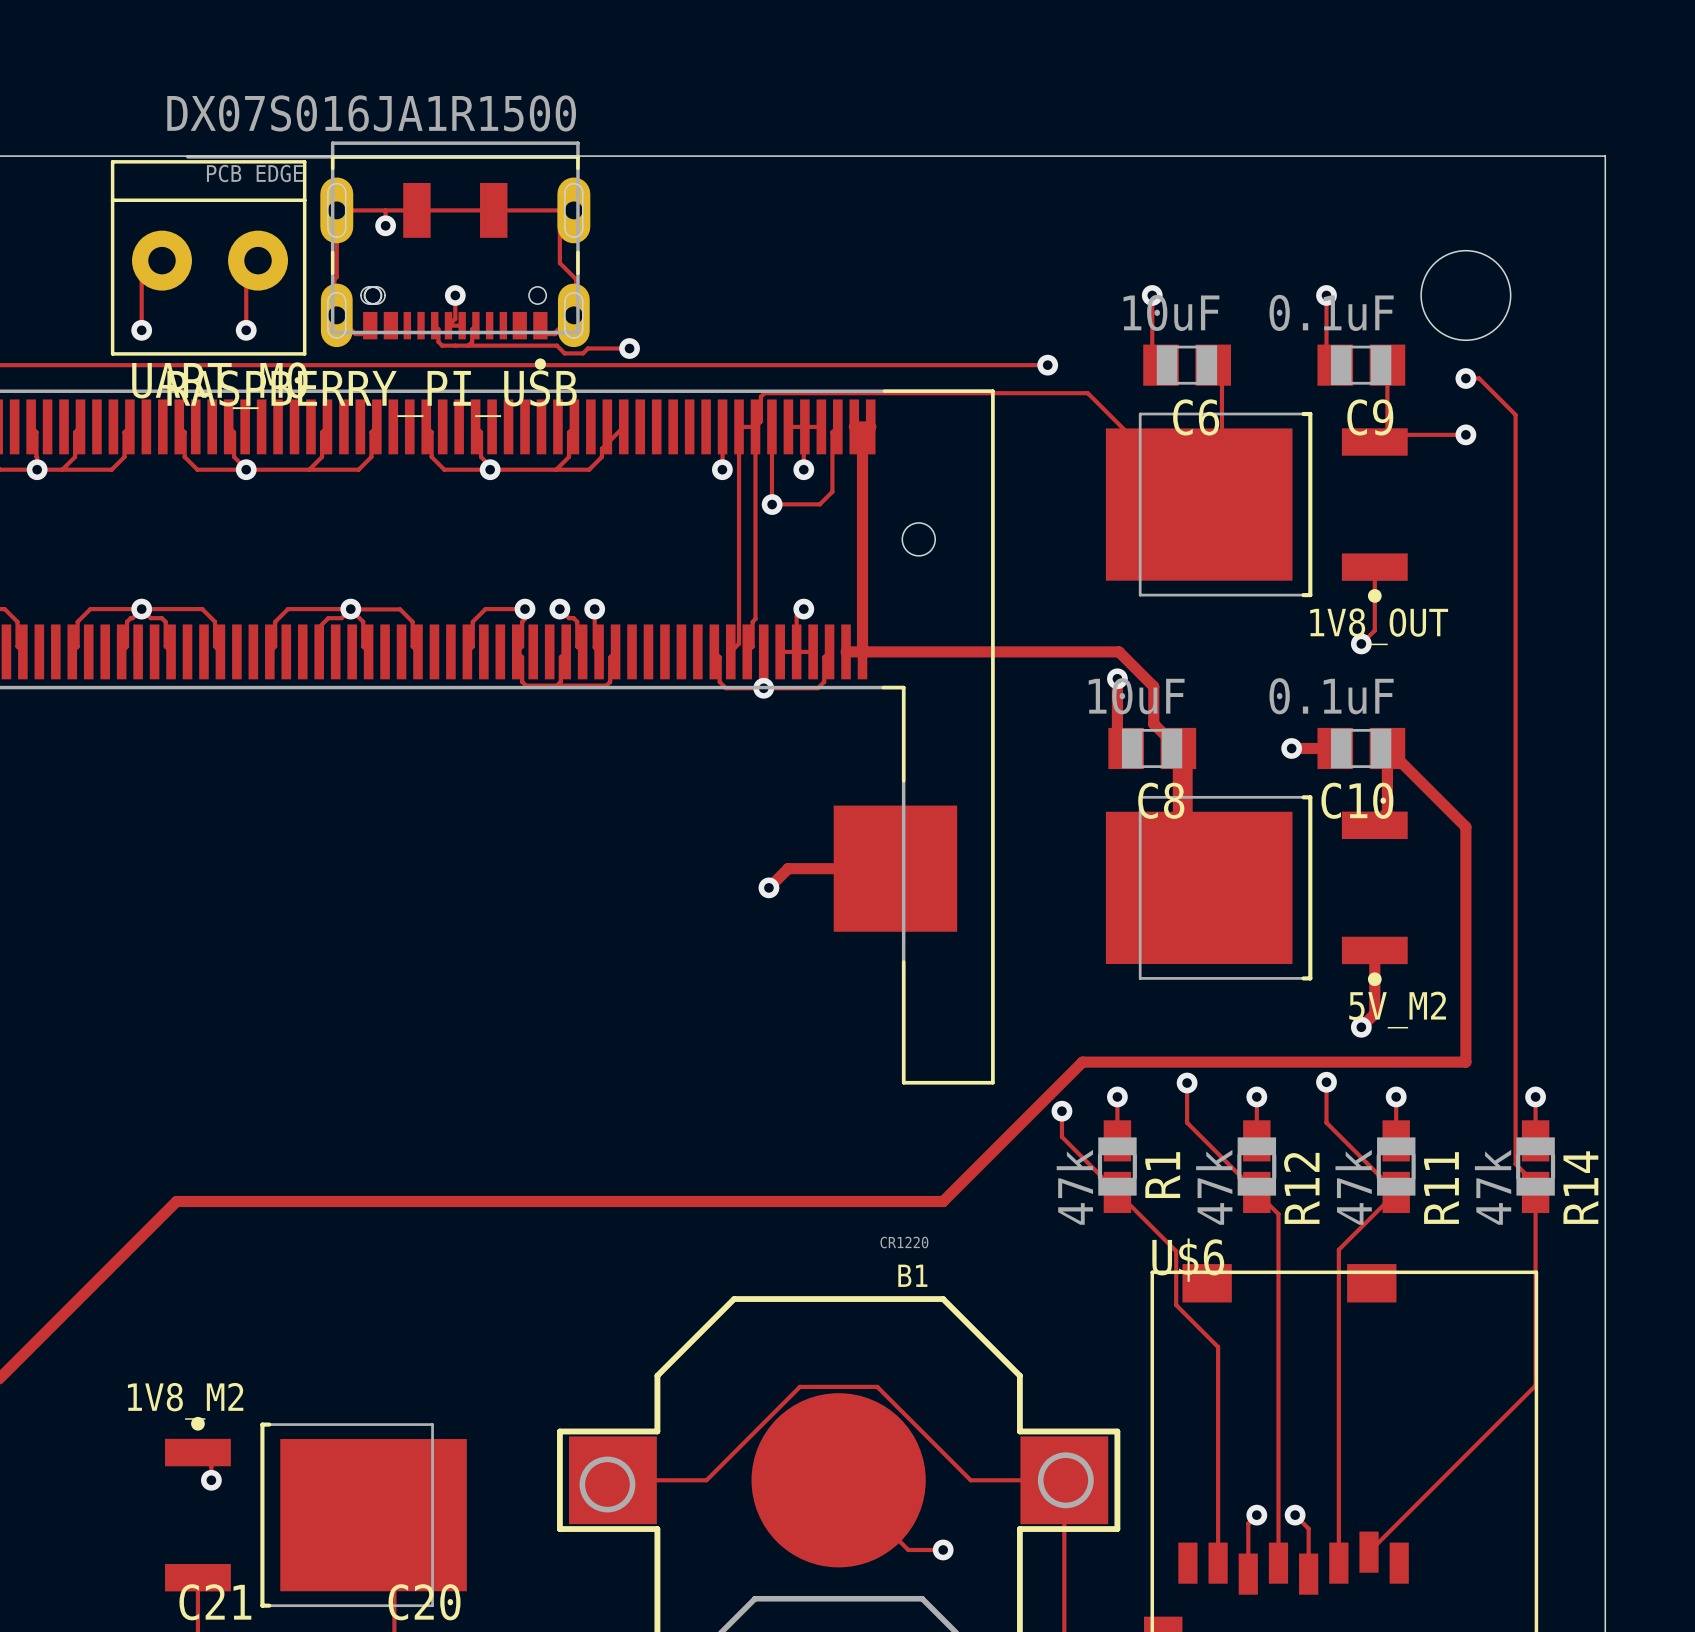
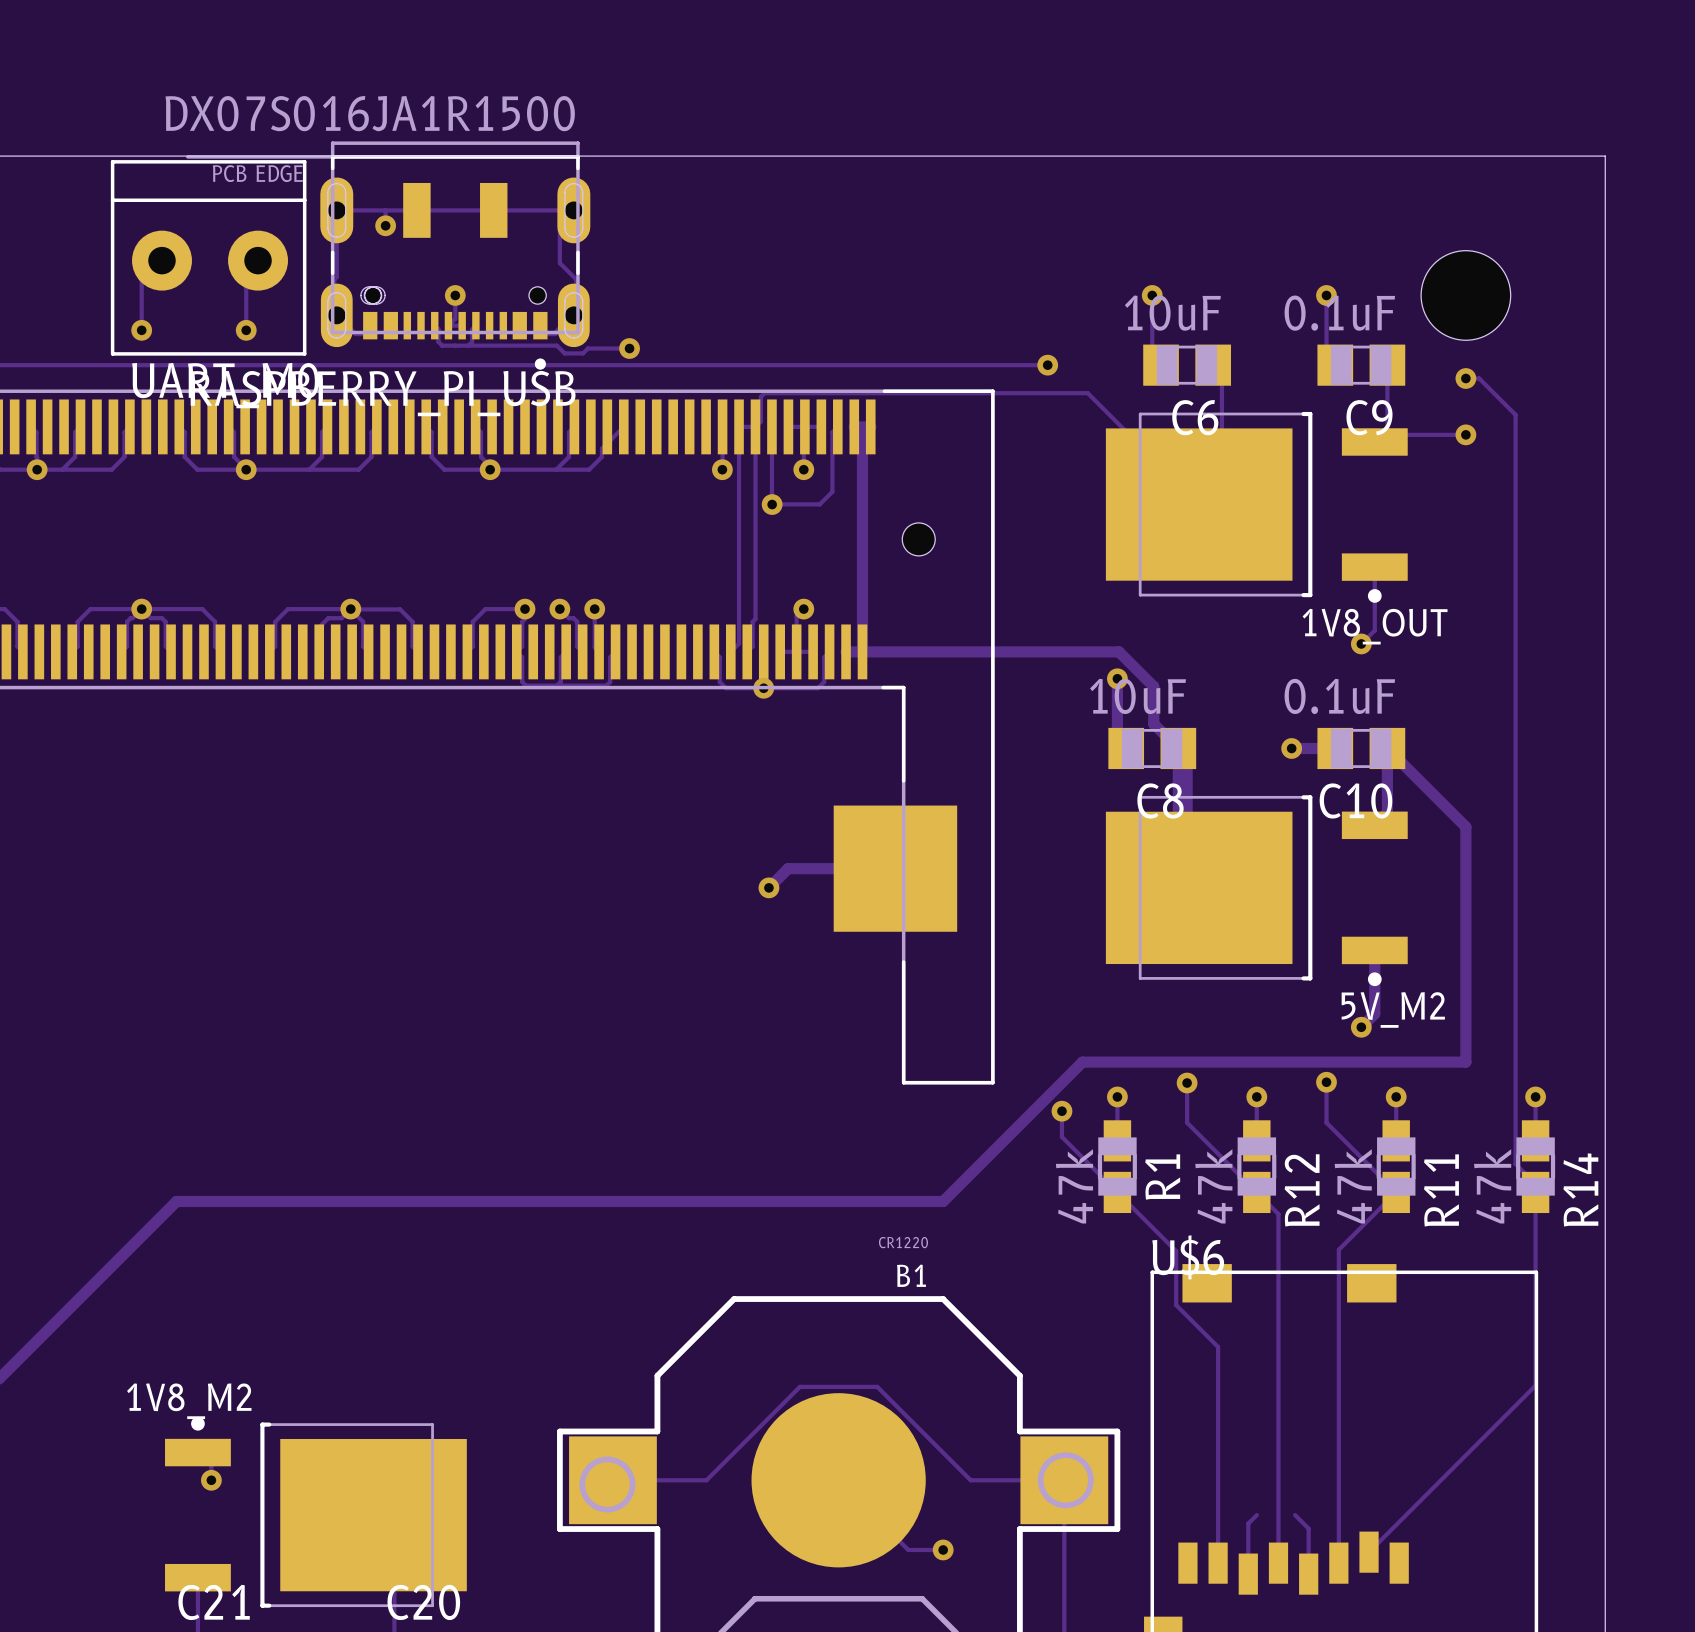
via: (1256, 1515) -> none
via: (1295, 1515) -> none

